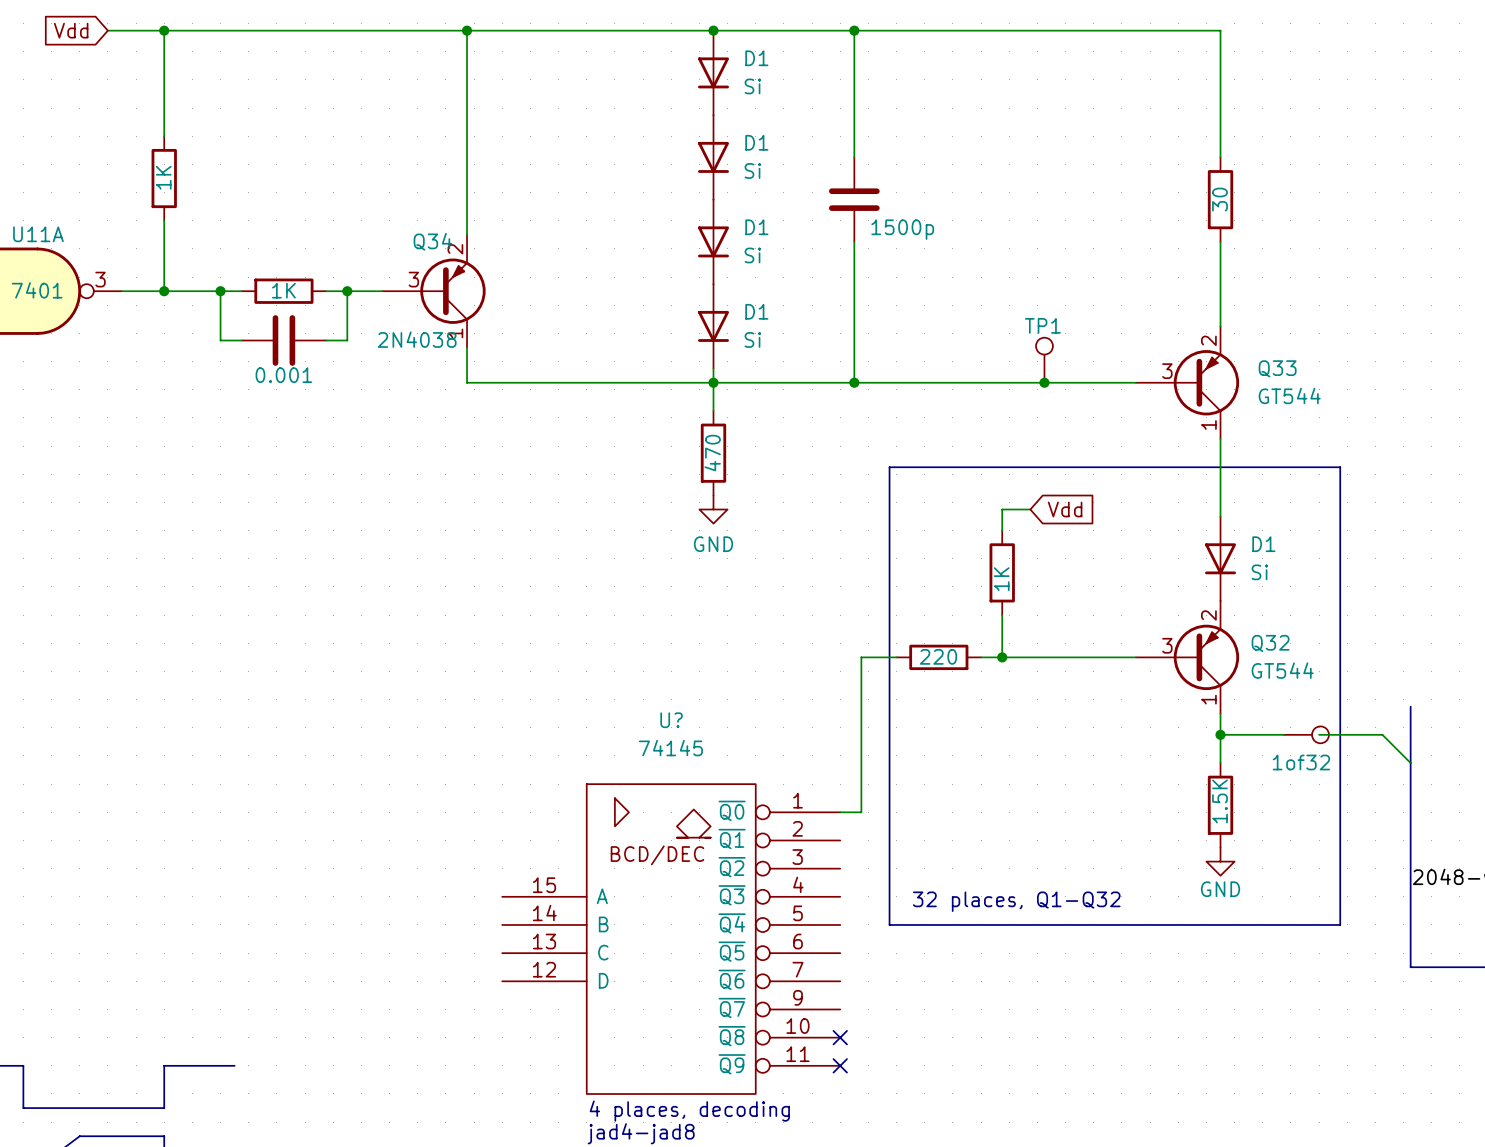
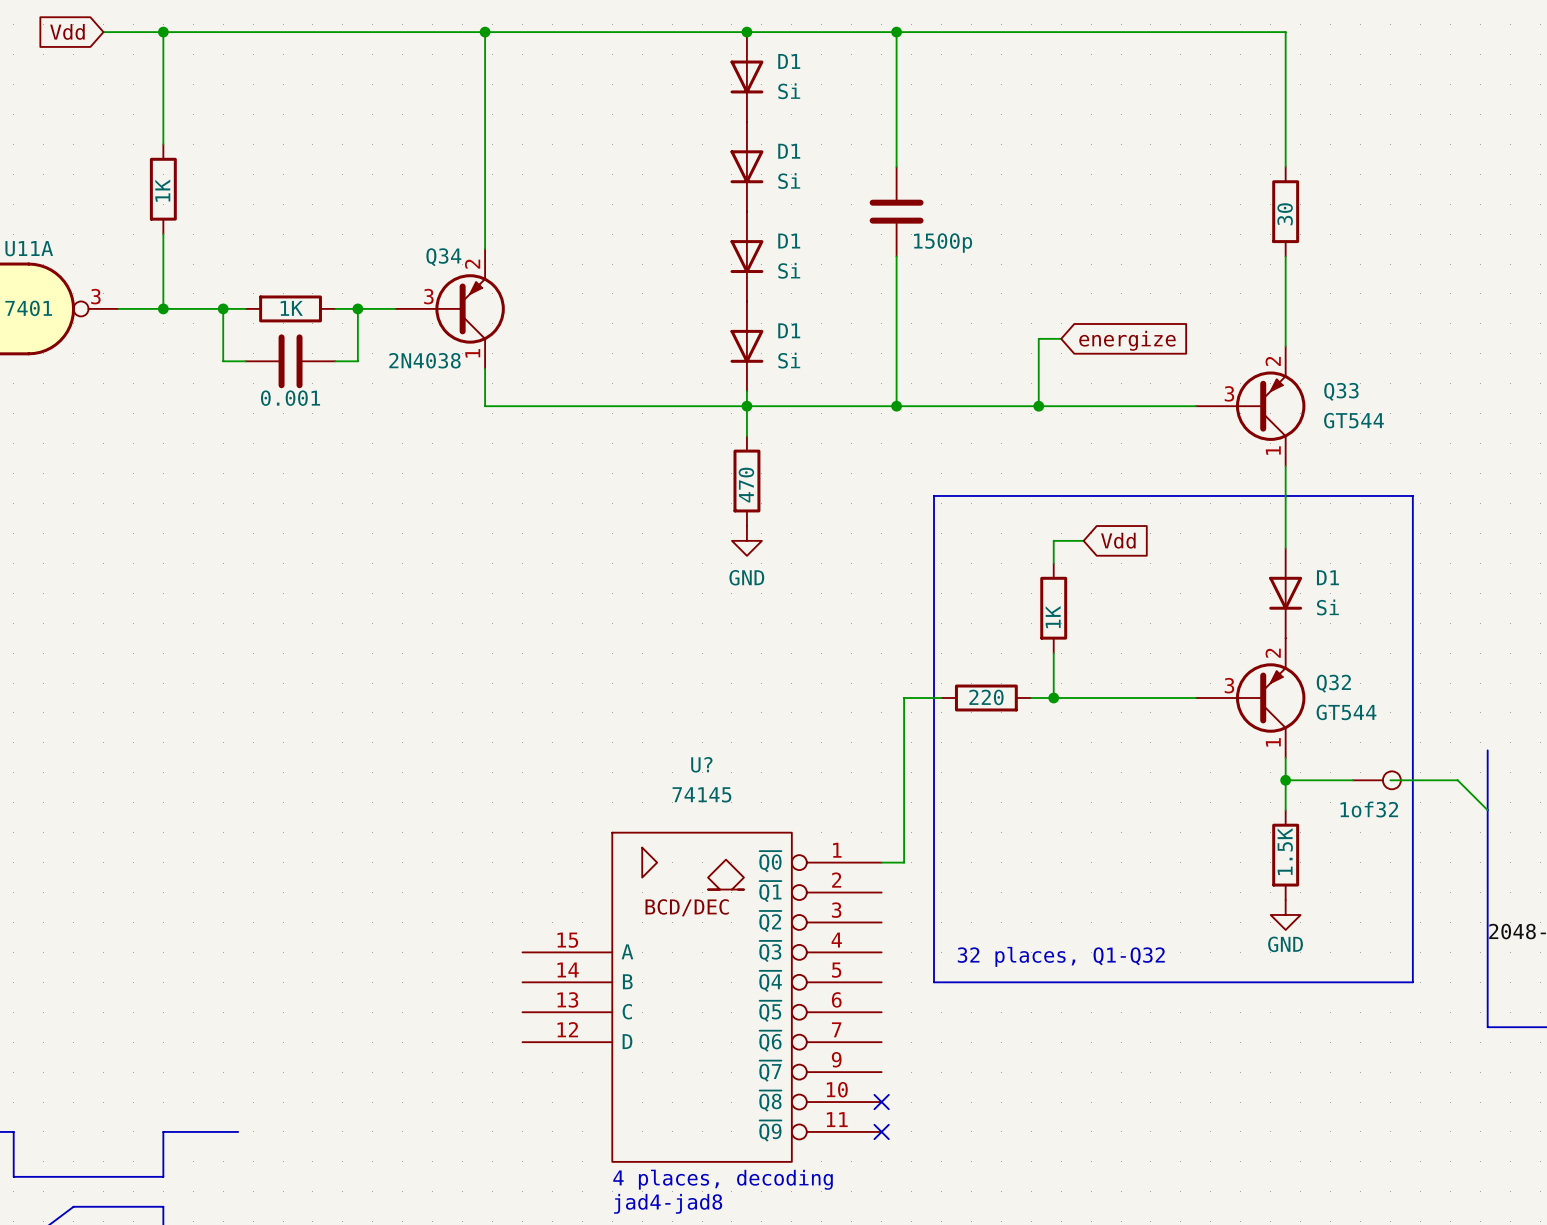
wire: none -> (1061, 338) (1038, 338) (1038, 406)
global label: none -> energize (1127, 340)
TP1: (1044, 360) -> none
junction position: (1044, 382) -> (1038, 406)

